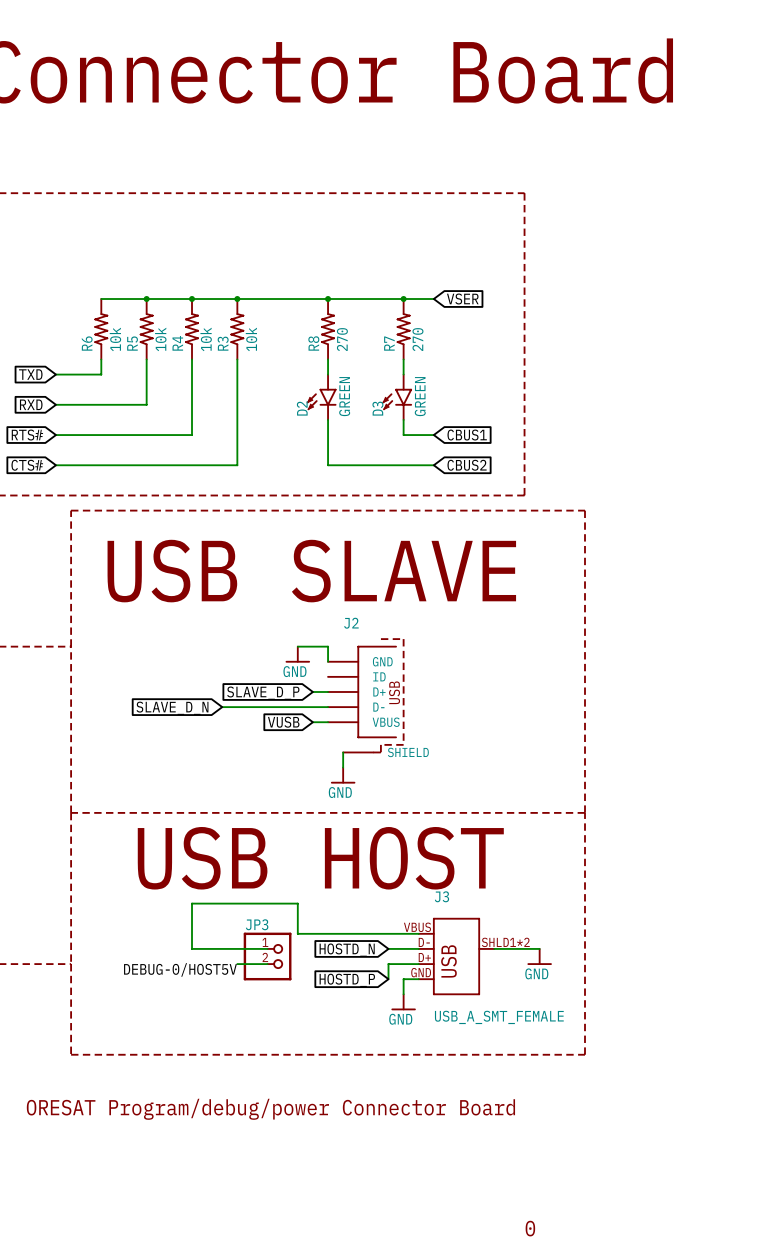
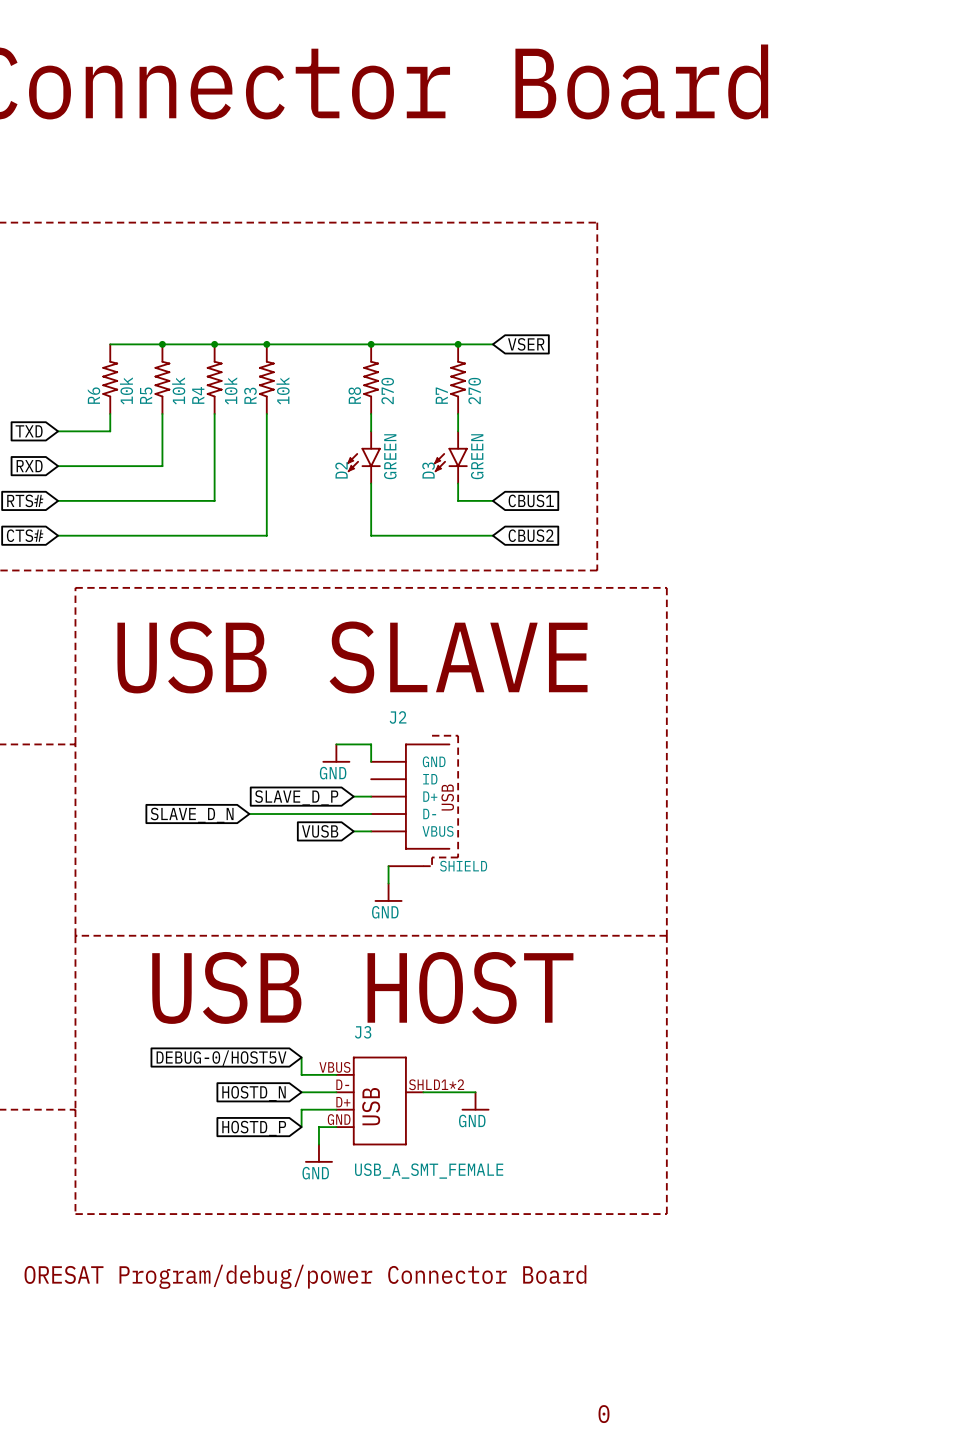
global label: none -> DEBUG-0/HOST5V (221, 1058)
wire: (418, 933) (297, 933) (297, 903) (192, 903) (192, 948) (267, 948) -> (336, 1092) (301, 1092)
wire: none -> (423, 1092) (440, 1092)
wire: (494, 948) (539, 948) -> none
global label position: HOSTD_N (347, 950) -> HOSTD_N (254, 1093)
JP3: (267, 956) -> none
J3 position: (456, 956) -> (379, 1100)
power symbol: GND (539, 956) -> none
wire: (237, 964) (267, 964) -> none
wire: (418, 964) (388, 964) (388, 979) -> (336, 1109) (301, 1109) (301, 1127)
label: DEBUG-0/HOST5V (180, 969) -> none
wire: (418, 979) (403, 979) (403, 994) -> (336, 1127) (318, 1127) (318, 1144)
global label position: HOSTD_P (347, 980) -> HOSTD_P (254, 1128)
power symbol: none -> GND (318, 1153)
power symbol position: GND (403, 1002) -> GND (475, 1101)

